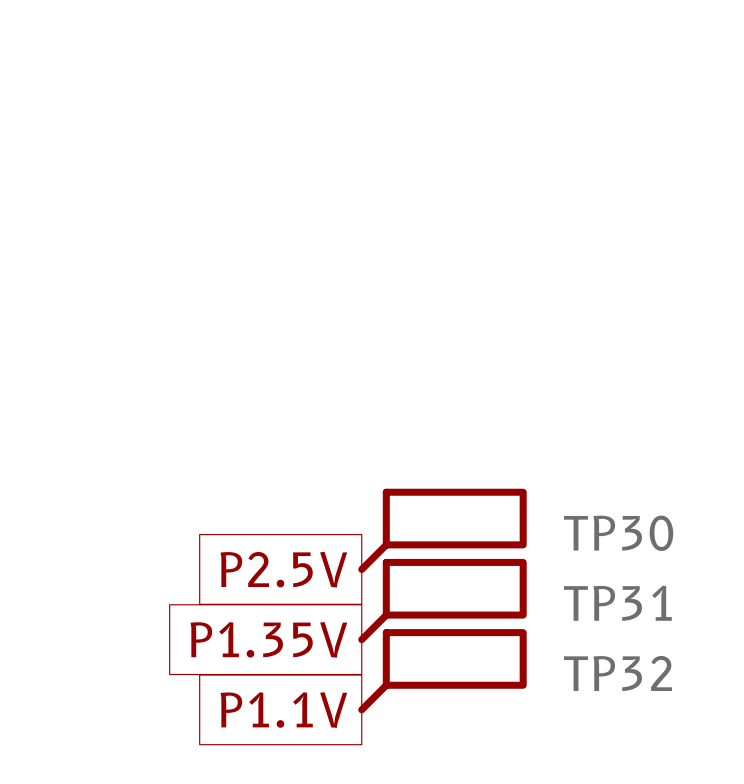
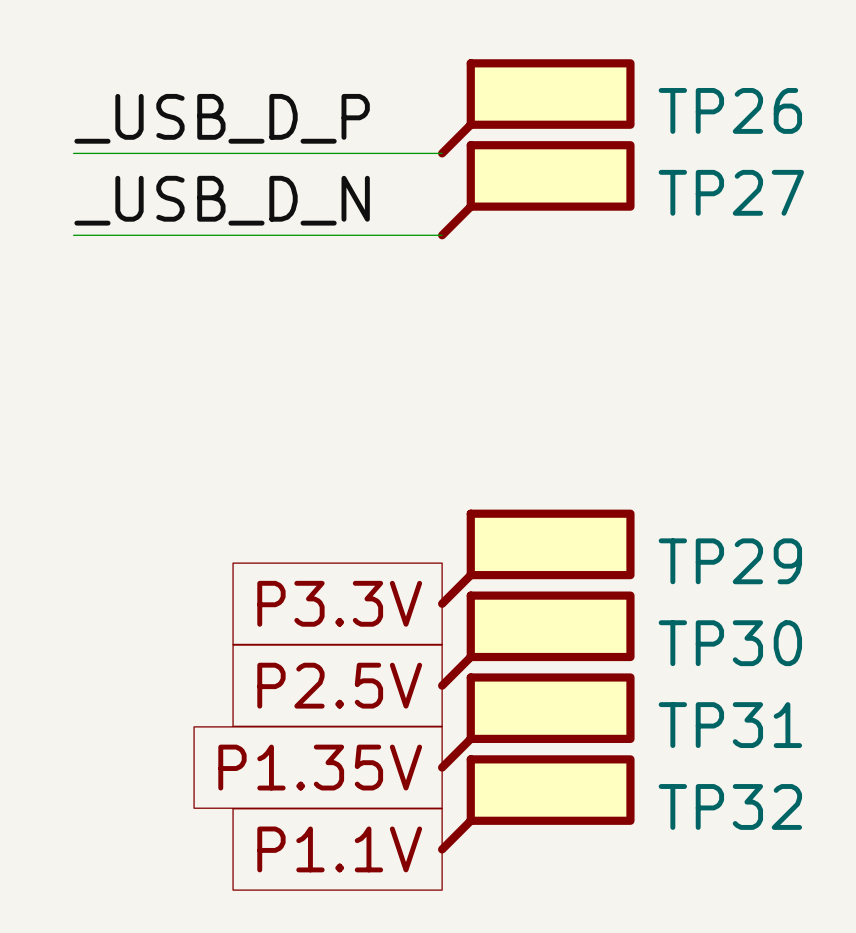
TP26: none -> (536, 108)
label: none -> _USB_D_P (222, 118)
wire: none -> (73, 153) (442, 153)
TP27: none -> (536, 190)
label: none -> _USB_D_N (222, 200)
wire: none -> (73, 235) (442, 235)
TP29: none -> (536, 558)
global label: none -> P3.3V (339, 603)

